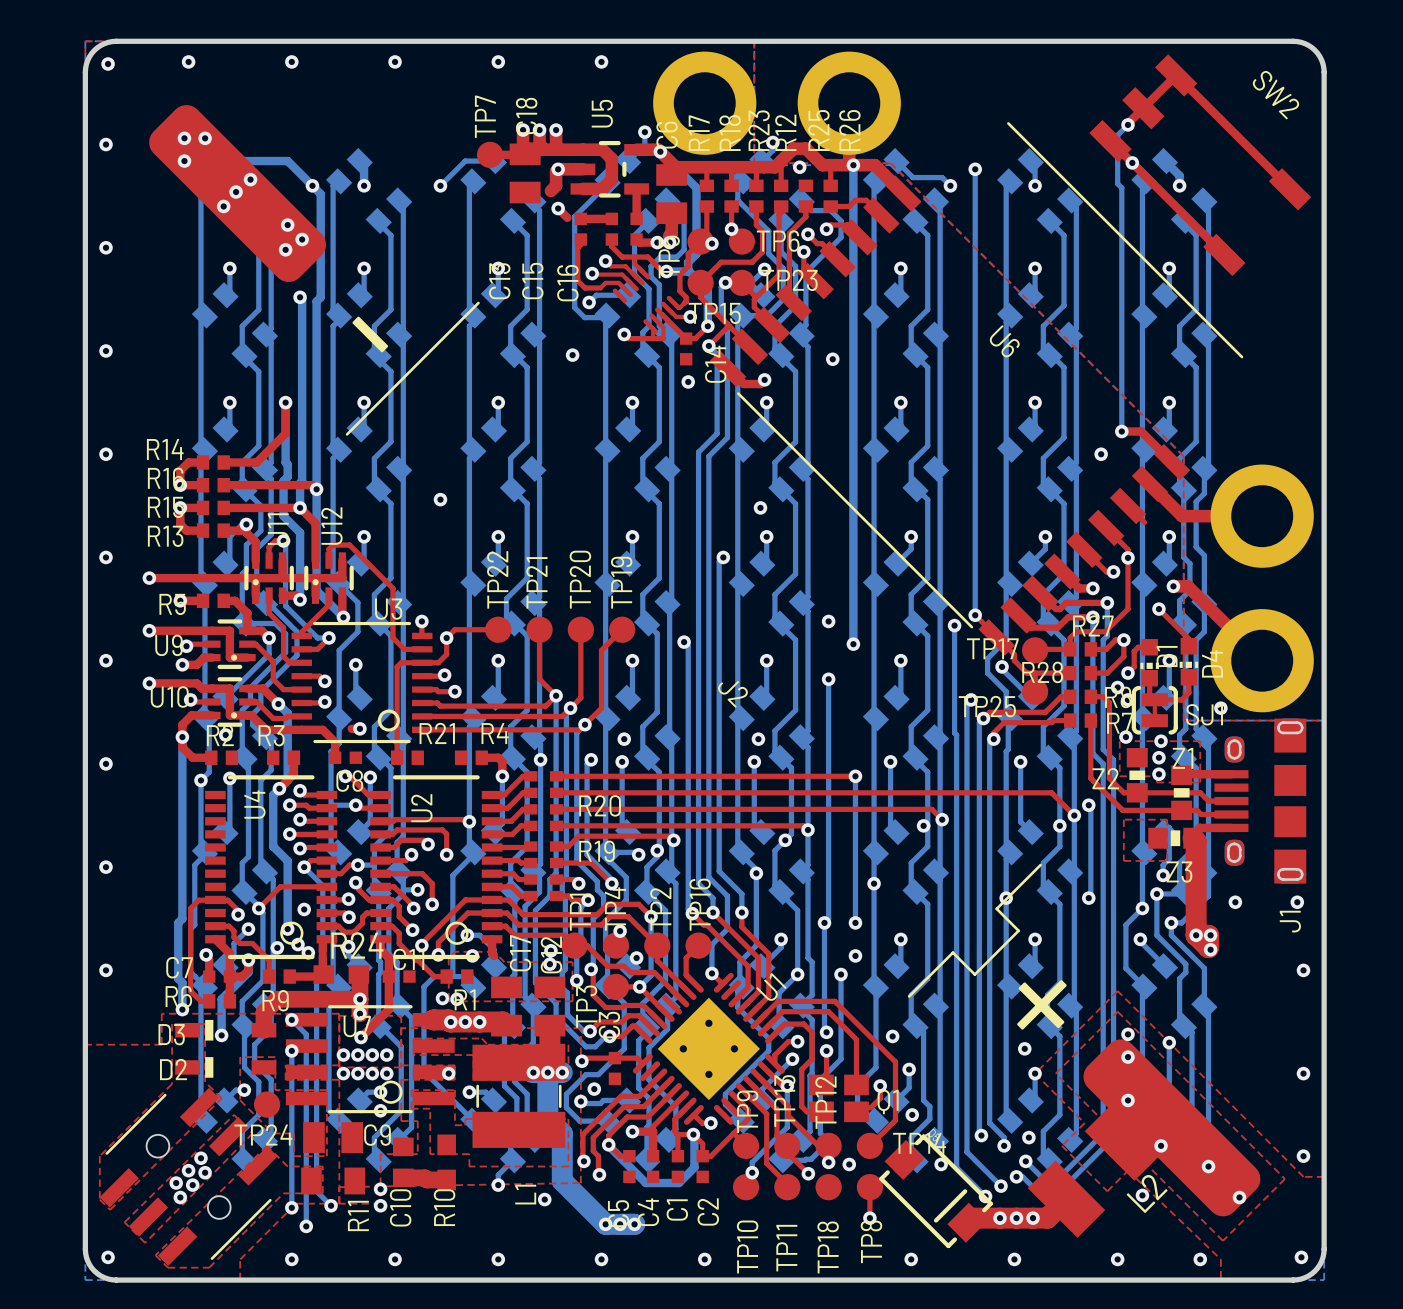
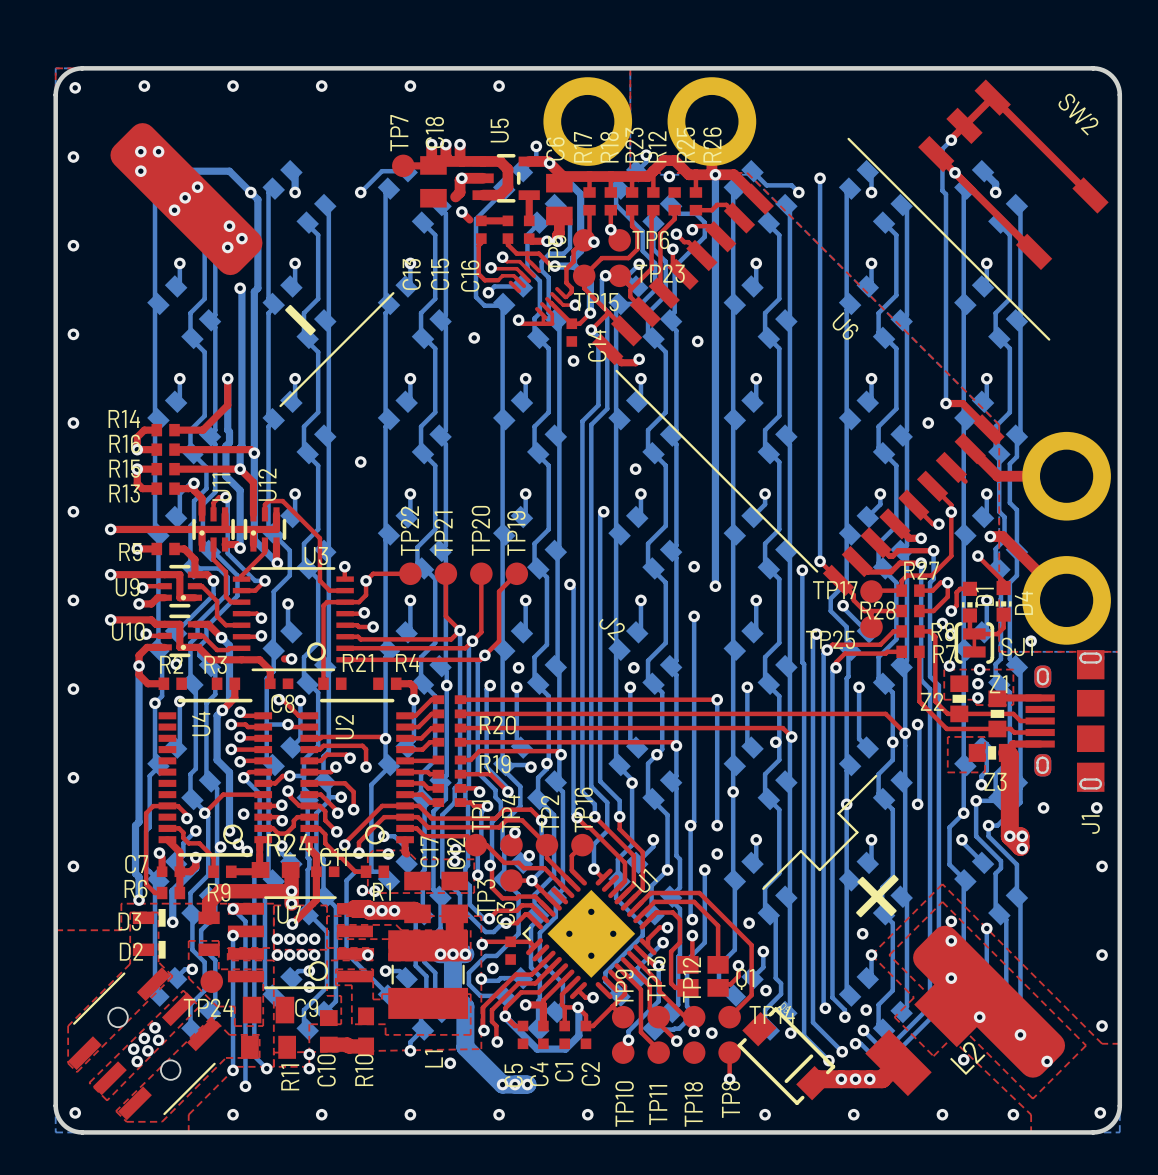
U1 footprint: [632, 972, 785, 1125] -> [522, 868, 657, 1000]

